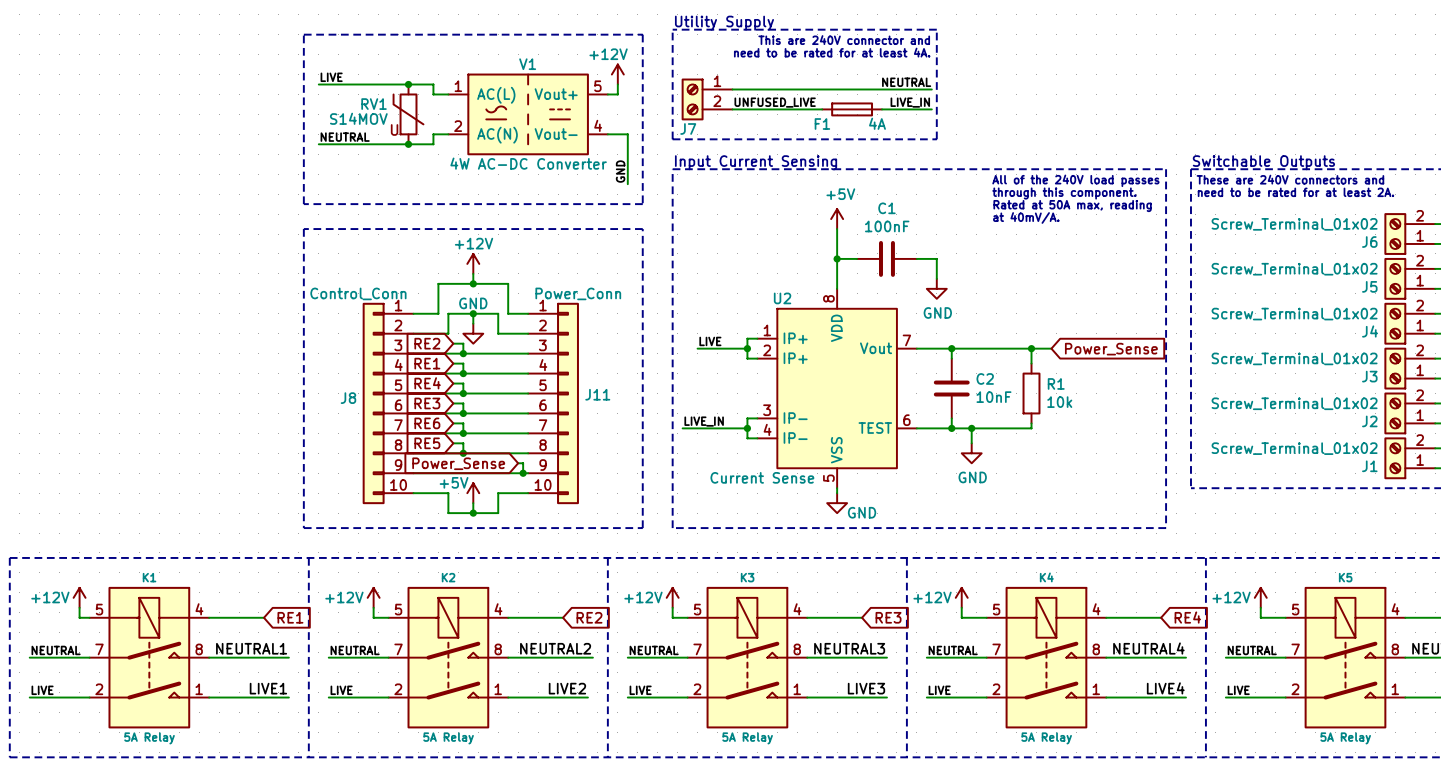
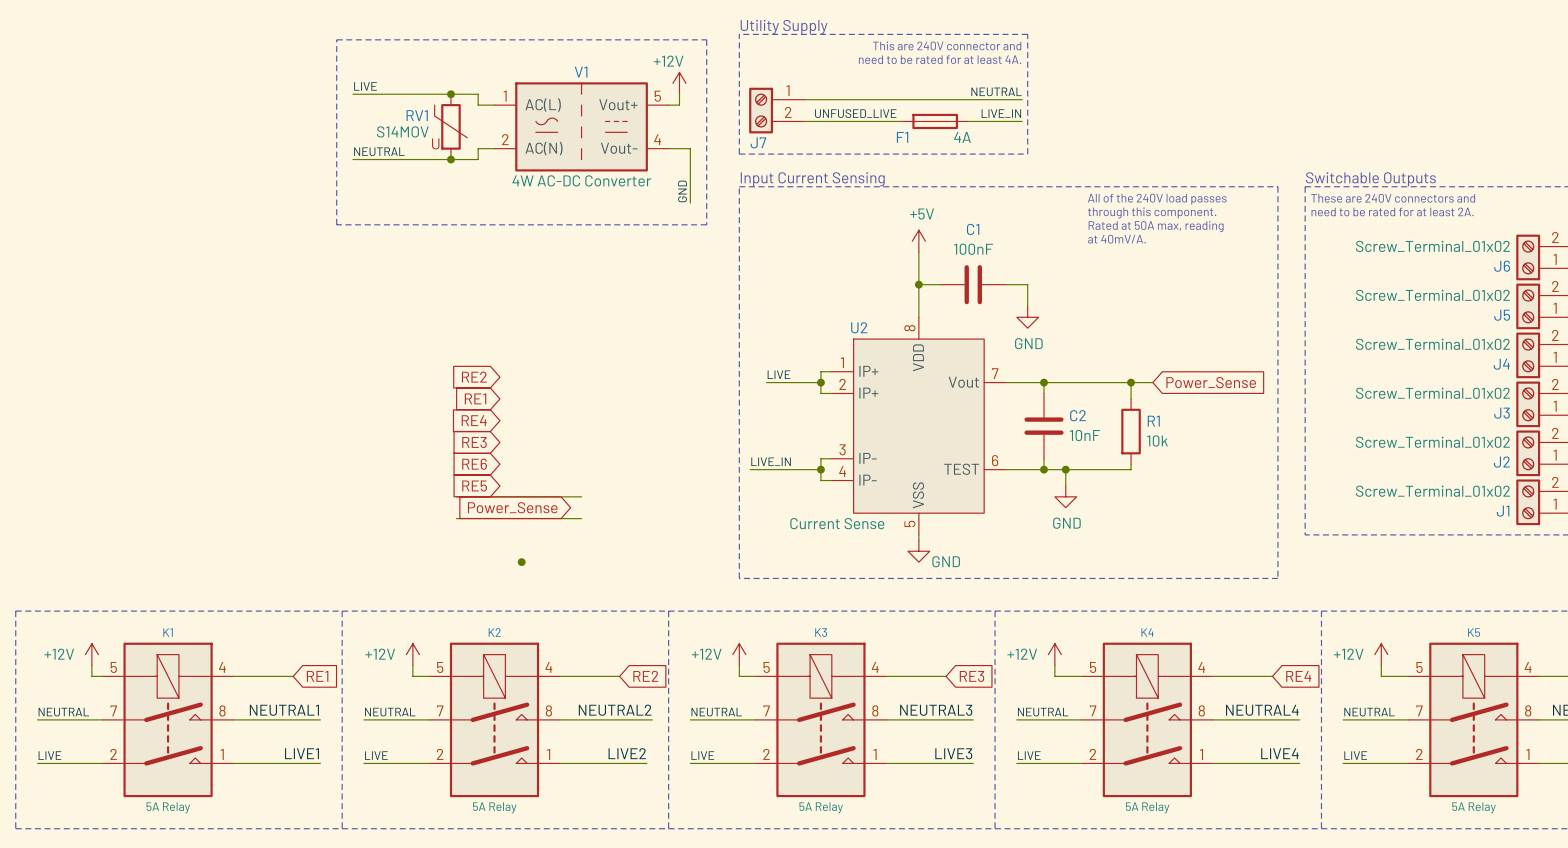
line: (303, 229) (303, 528) (642, 528) (642, 229) (303, 229) -> none
power symbol: +12V (473, 263) -> none
wire: (473, 273) (473, 283) -> none
junction: (473, 283) -> none
wire: (413, 313) (438, 313) (438, 283) (508, 283) (508, 313) (528, 313) -> none
wire: (473, 313) (473, 323) -> none
junction: (473, 313) -> none
wire: (413, 333) (448, 333) (448, 313) (498, 313) (498, 333) (528, 333) -> none
power symbol: GND (473, 333) -> none
wire: (453, 343) (463, 343) (463, 353) -> none
wire: (413, 353) (528, 353) -> none
junction: (463, 353) -> none
wire: (453, 363) (463, 363) (463, 373) -> none
wire: (413, 373) (528, 373) -> none
junction: (463, 373) -> none
wire: (453, 383) (463, 383) (463, 393) -> none
wire: (413, 393) (528, 393) -> none
junction: (463, 393) -> none
J8: Control_Conn (388, 403) -> none
wire: (453, 403) (463, 403) (463, 413) -> none
J11: Power_Conn (553, 403) -> none
wire: (413, 413) (528, 413) -> none
junction: (463, 413) -> none
wire: (453, 423) (463, 423) (463, 433) -> none
wire: (413, 433) (528, 433) -> none
junction: (463, 433) -> none
wire: (453, 443) (463, 443) (463, 453) -> none
junction: (463, 453) -> none
wire: (518, 463) (523, 463) (523, 473) -> none
junction: (523, 473) -> none
wire: (413, 493) (448, 493) (448, 513) (498, 513) (498, 493) (528, 493) -> none
power symbol: +5V (473, 493) -> none
wire: (473, 503) (473, 513) -> none

